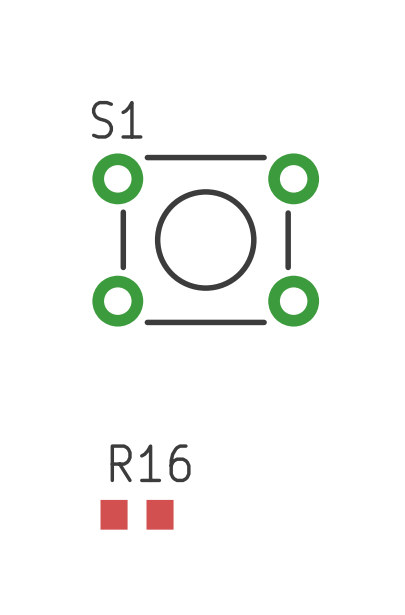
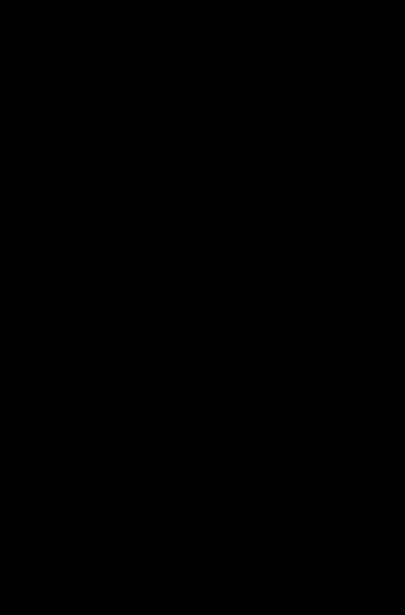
S1: (205, 240) -> none
R16: (137, 514) -> none

